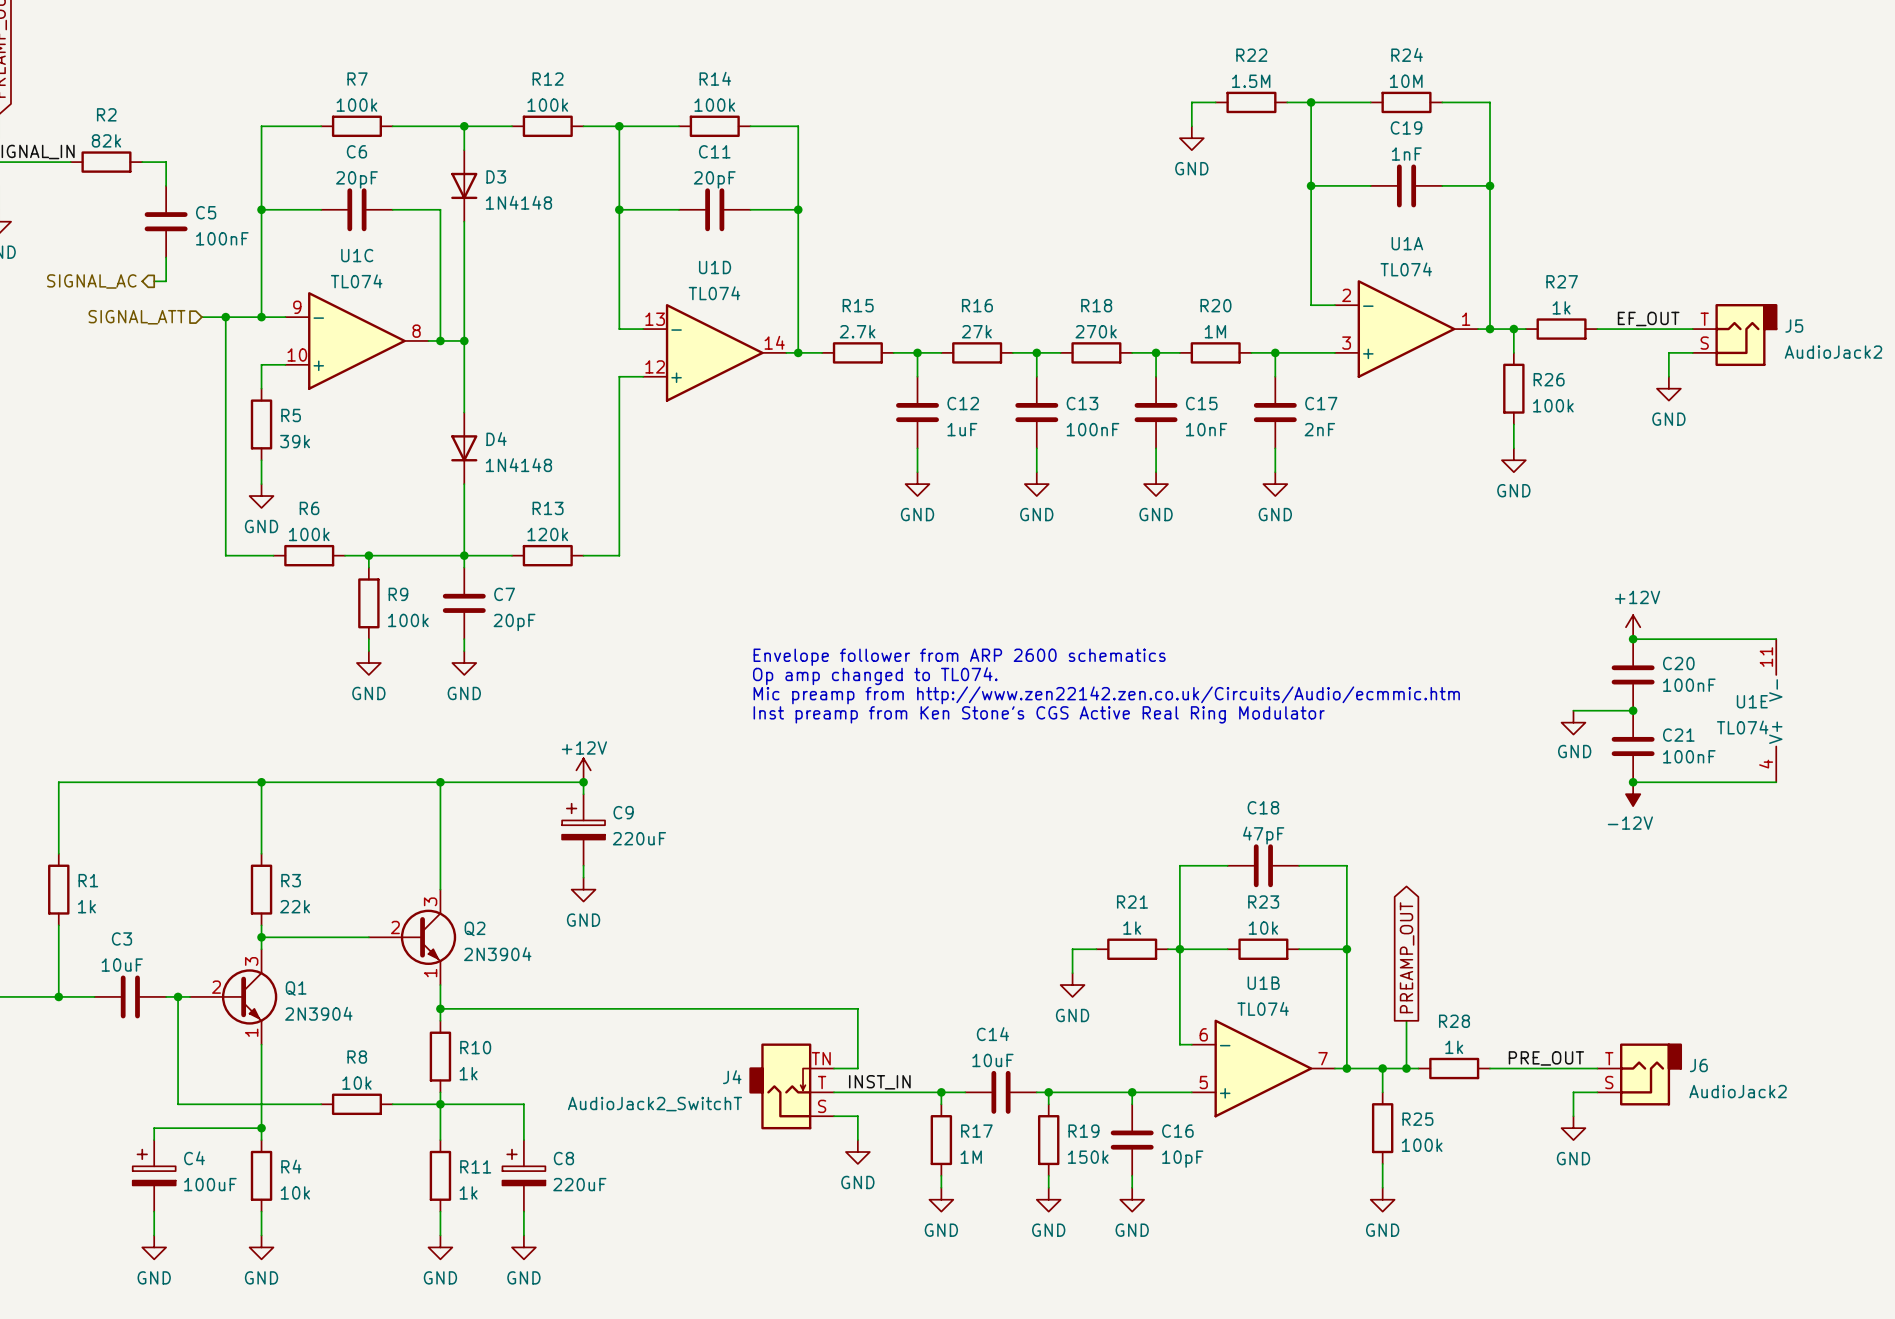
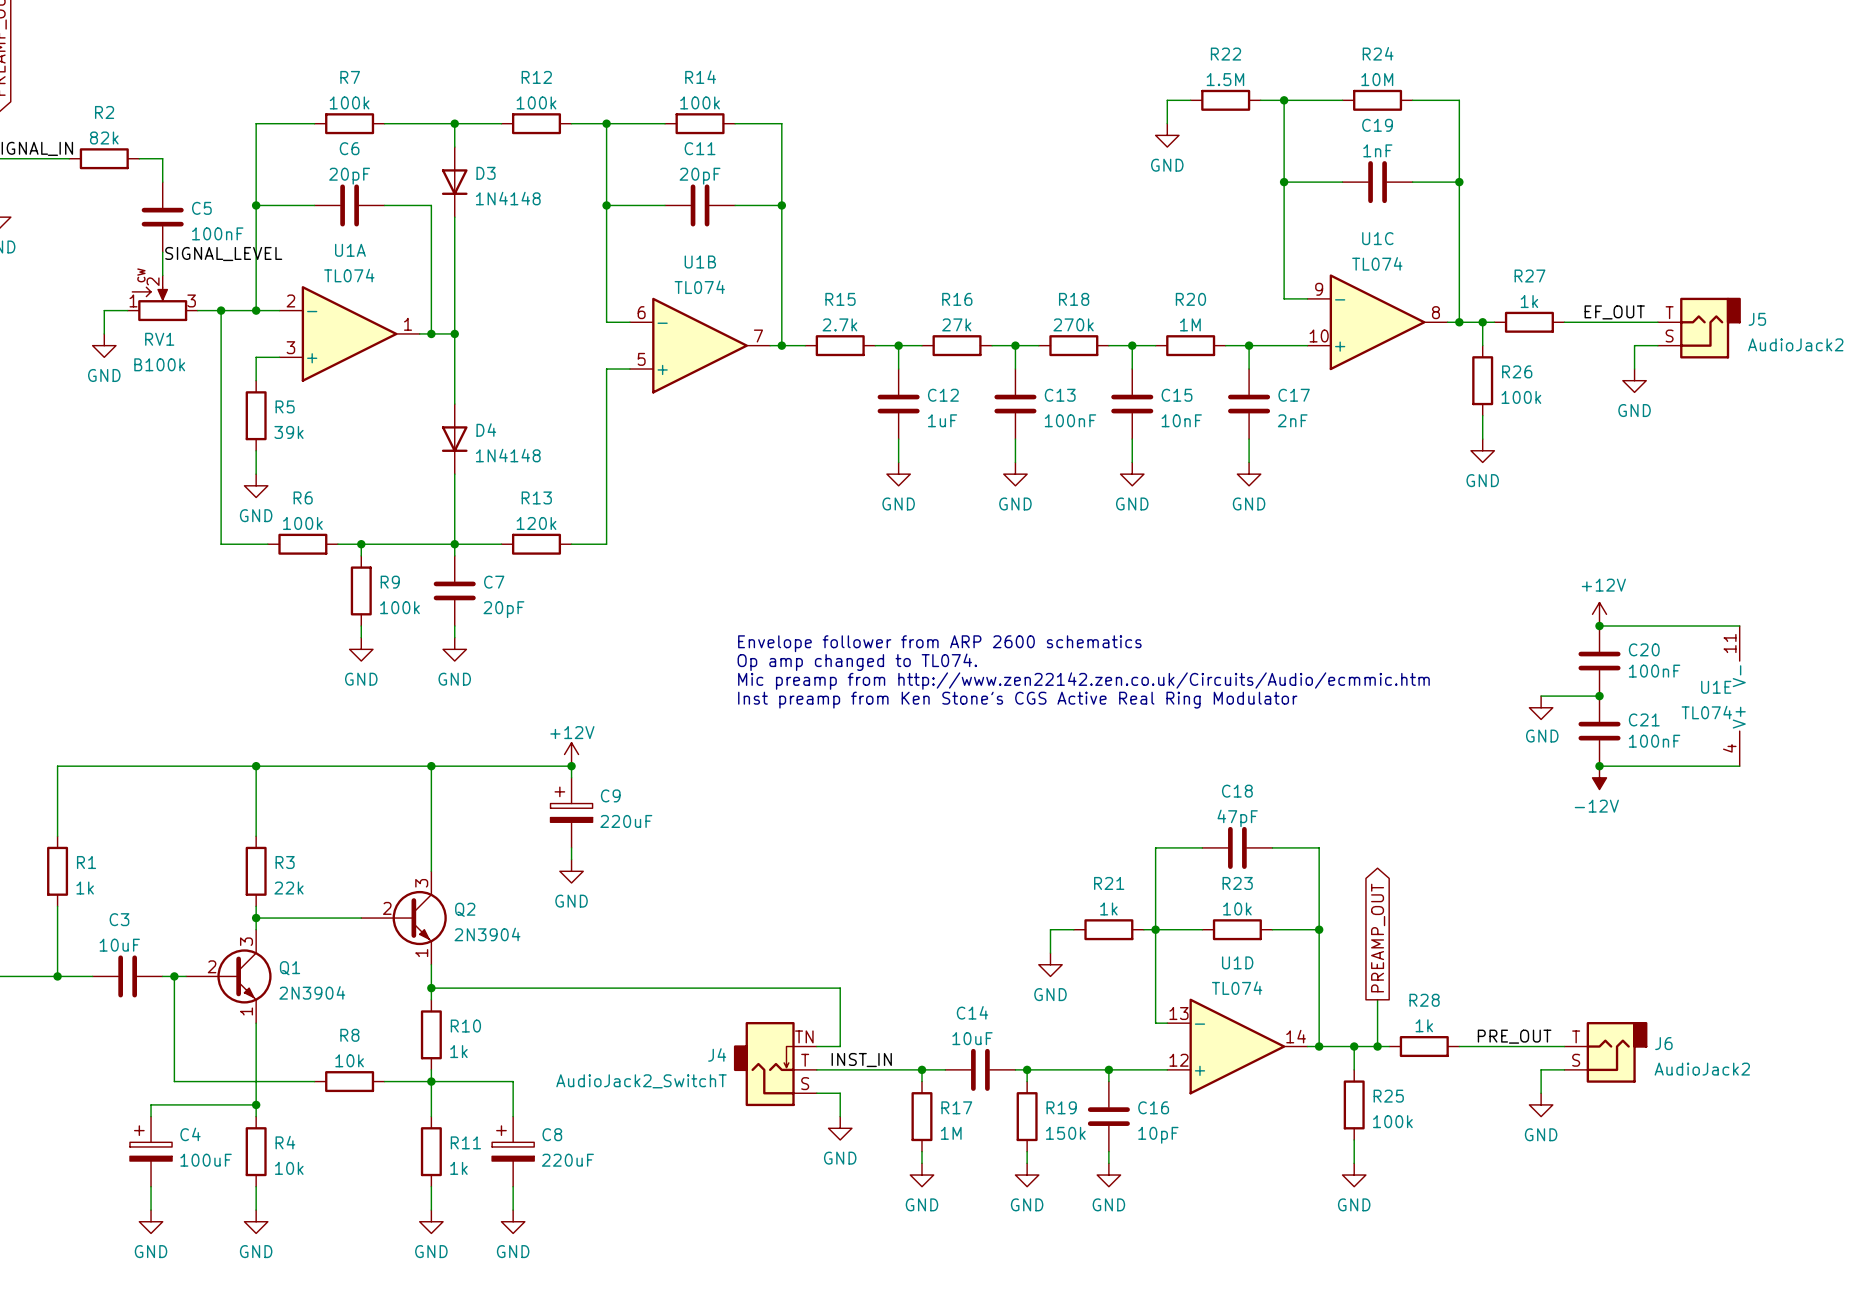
label: none -> SIGNAL_LEVEL (223, 254)
hierarchical label: SIGNAL_AC (91, 281) -> none
wire: (154, 281) (166, 281) -> none
RV1: none -> B100k (162, 298)
wire: none -> (127, 310) (104, 310) (104, 333)
hierarchical label: SIGNAL_ATT (136, 317) -> none
U1A position: (1406, 329) -> (349, 333)
U1C position: (356, 340) -> (1377, 322)
power symbol: none -> GND (104, 345)
U1D position: (714, 352) -> (1237, 1046)
U1B position: (1263, 1068) -> (700, 345)

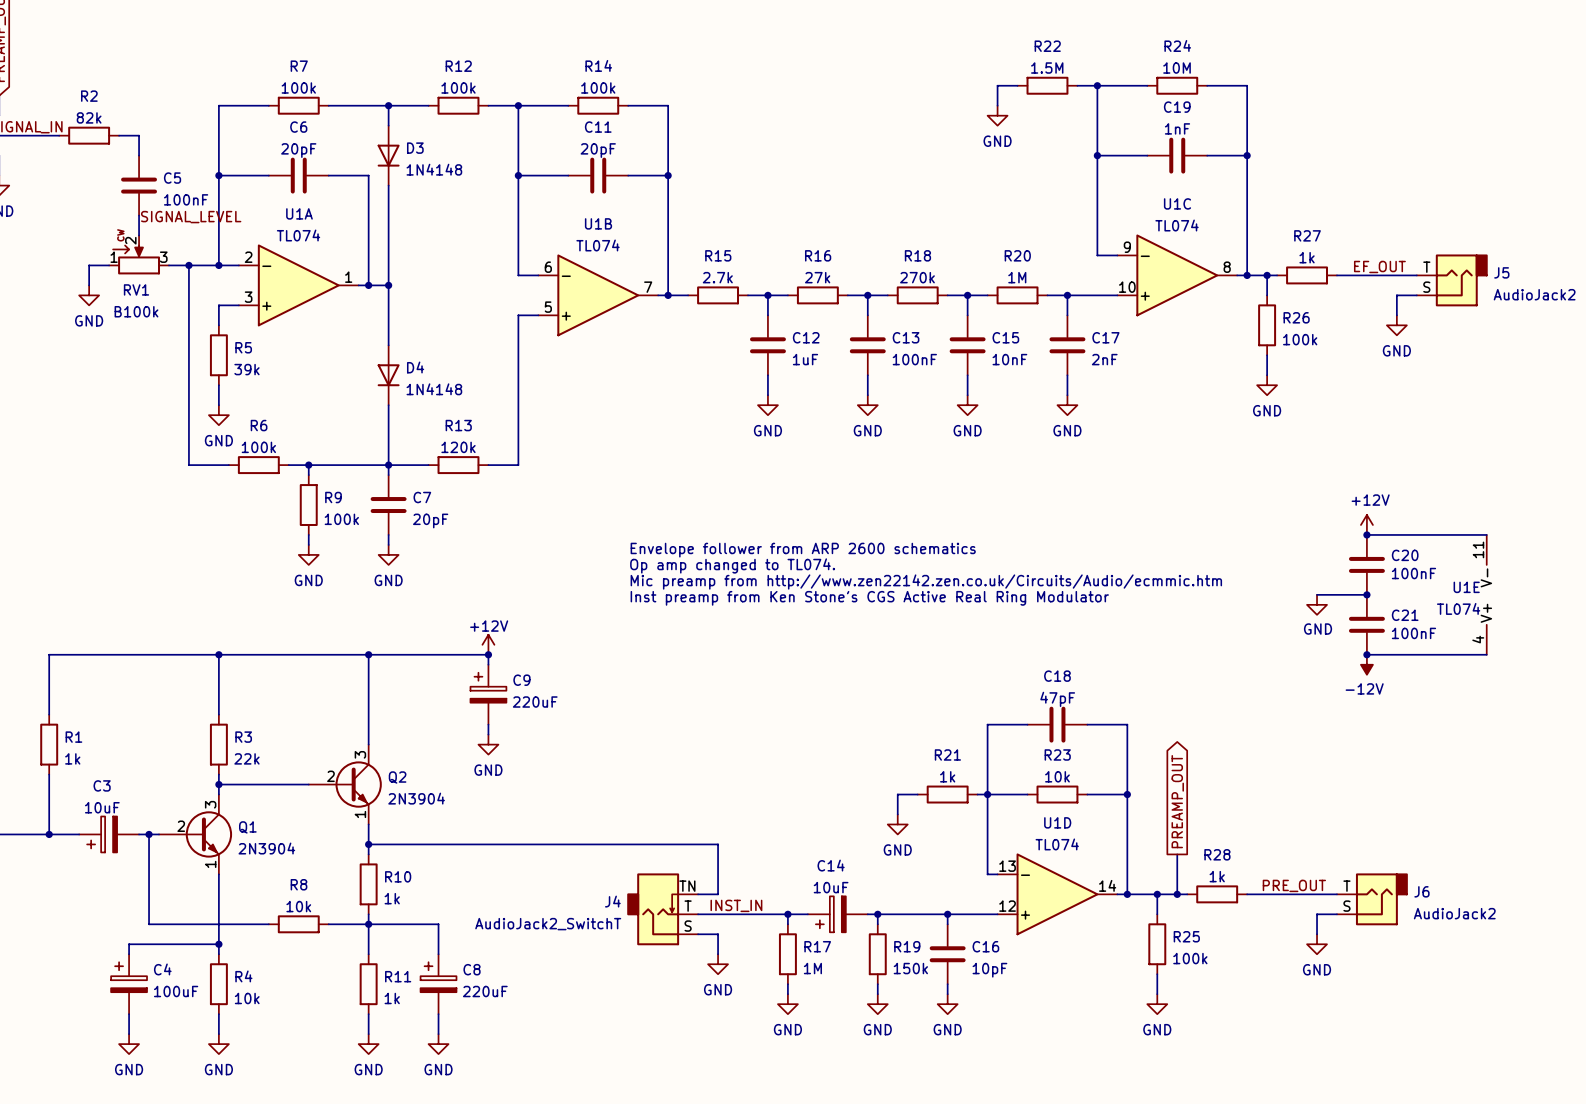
C3 symbol: [92, 955, 163, 998] -> [79, 816, 140, 853]
C14 symbol: [945, 1048, 1016, 1091] -> [807, 896, 868, 933]

